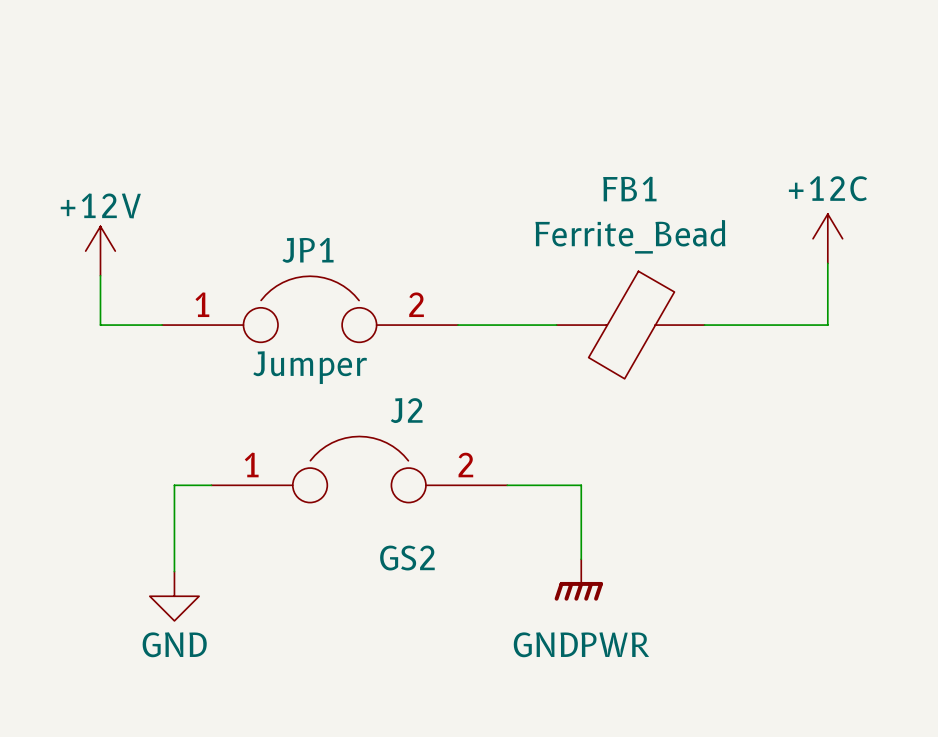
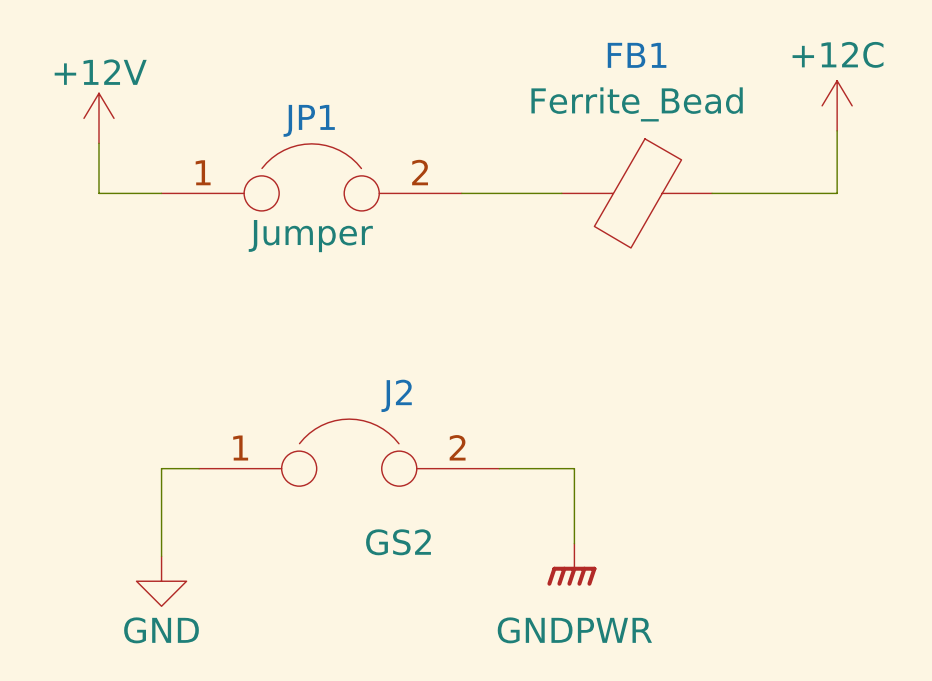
power symbol position: +12C (827, 238) -> +12C (837, 105)
power symbol position: +12V (100, 251) -> +12V (99, 118)
wire: (827, 263) (827, 325) (704, 325) -> (837, 130) (837, 193) (712, 193)
wire: (100, 275) (100, 325) (162, 325) -> (99, 143) (99, 193) (161, 193)
JP1 position: (310, 309) -> (311, 177)
wire: (457, 325) (556, 325) -> (461, 193) (561, 193)
FB1 position: (630, 325) -> (636, 193)

